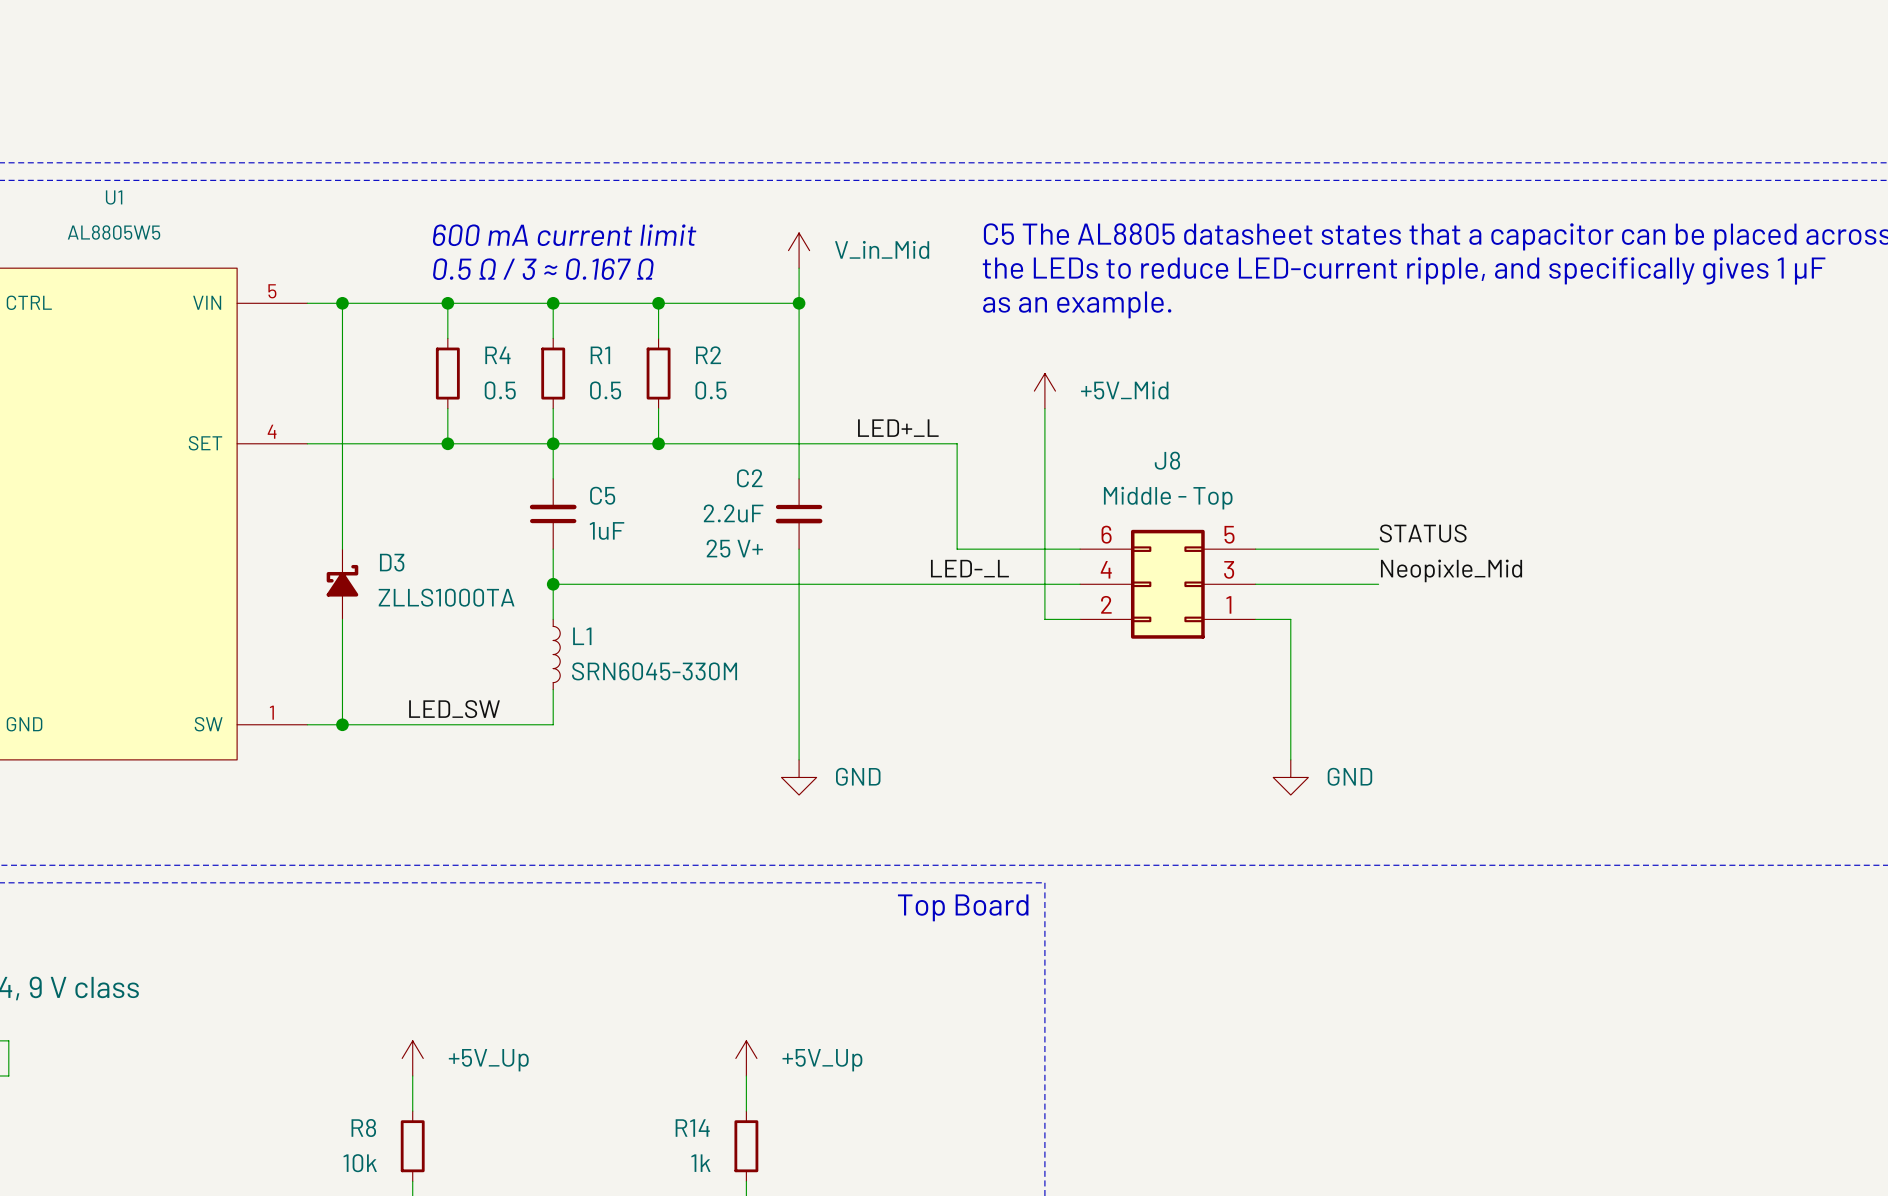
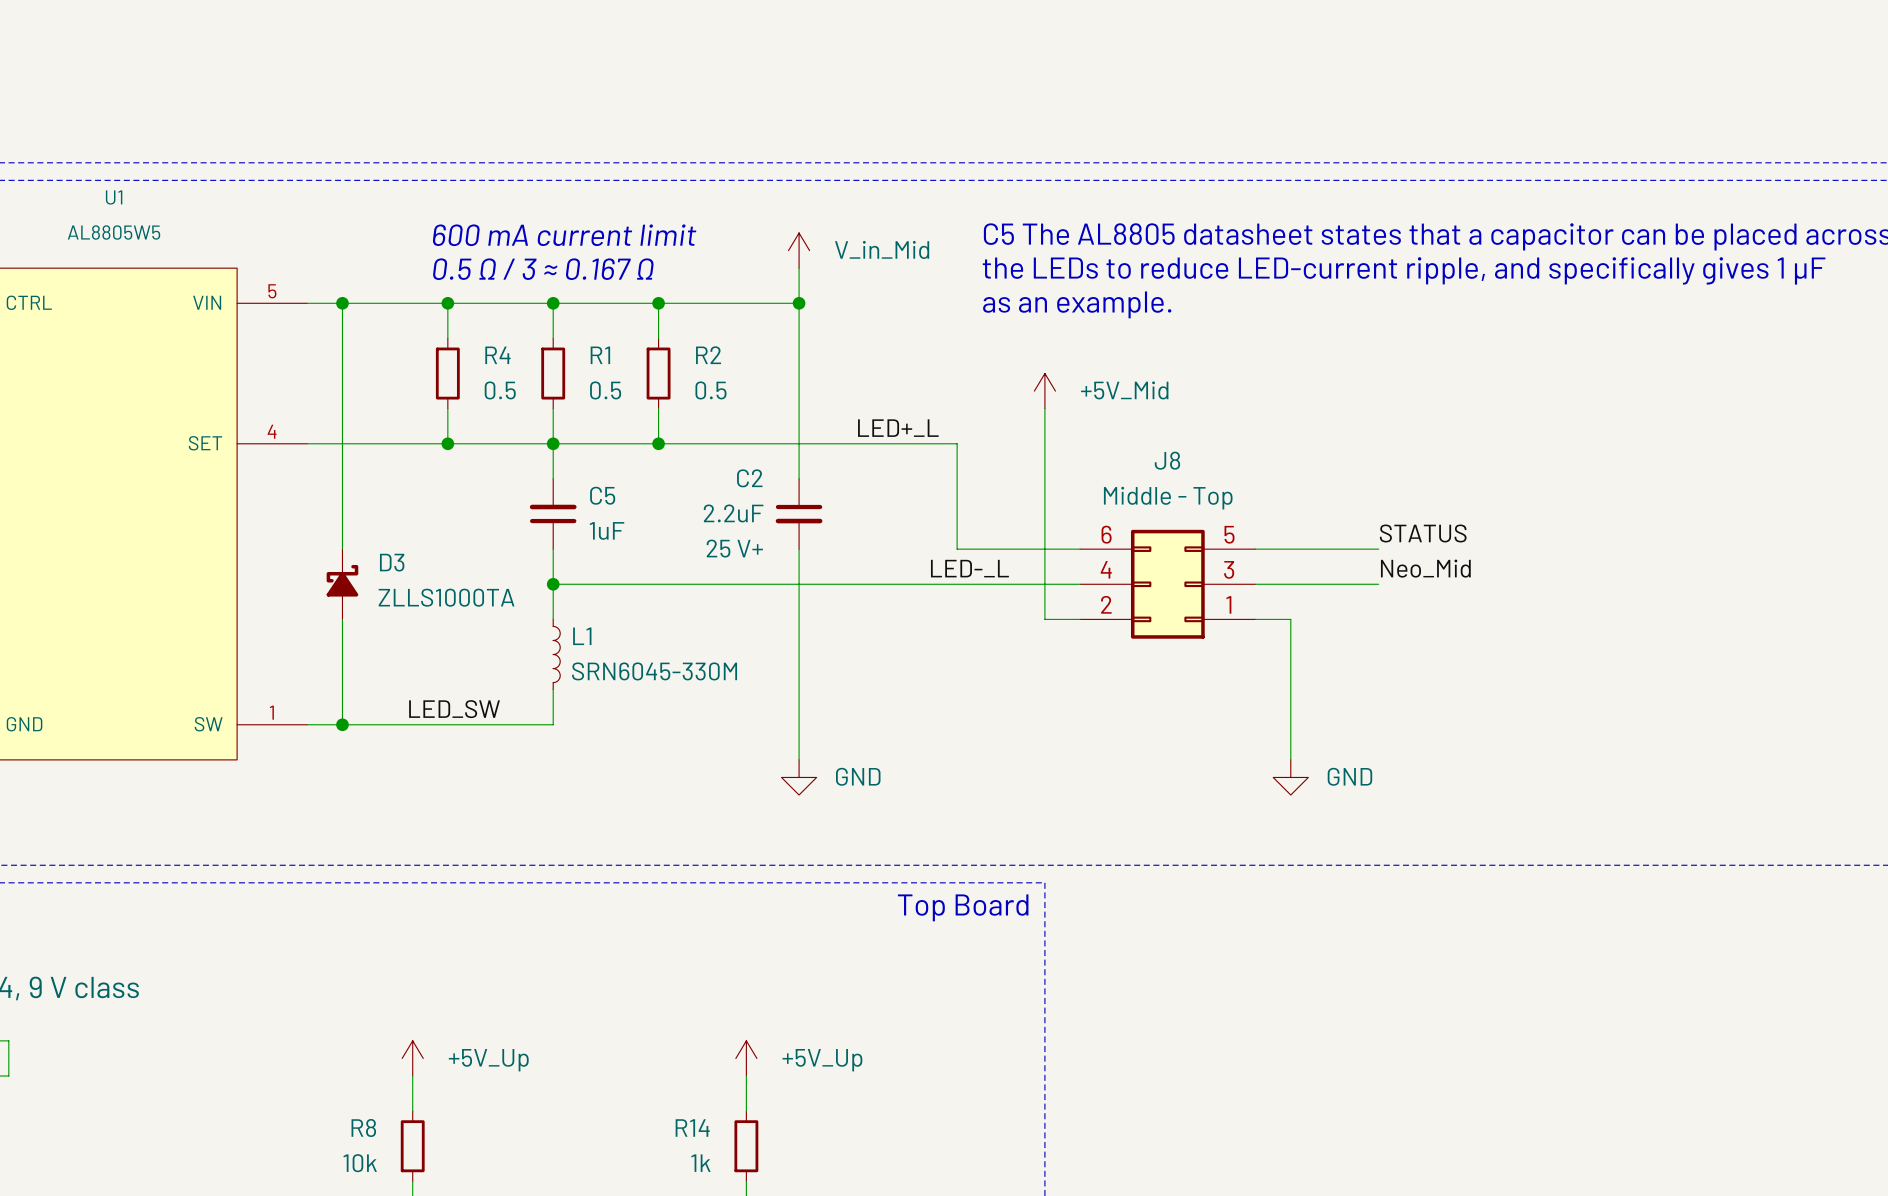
label: Neopixle_Mid (1451, 570) -> Neo_Mid (1425, 568)

